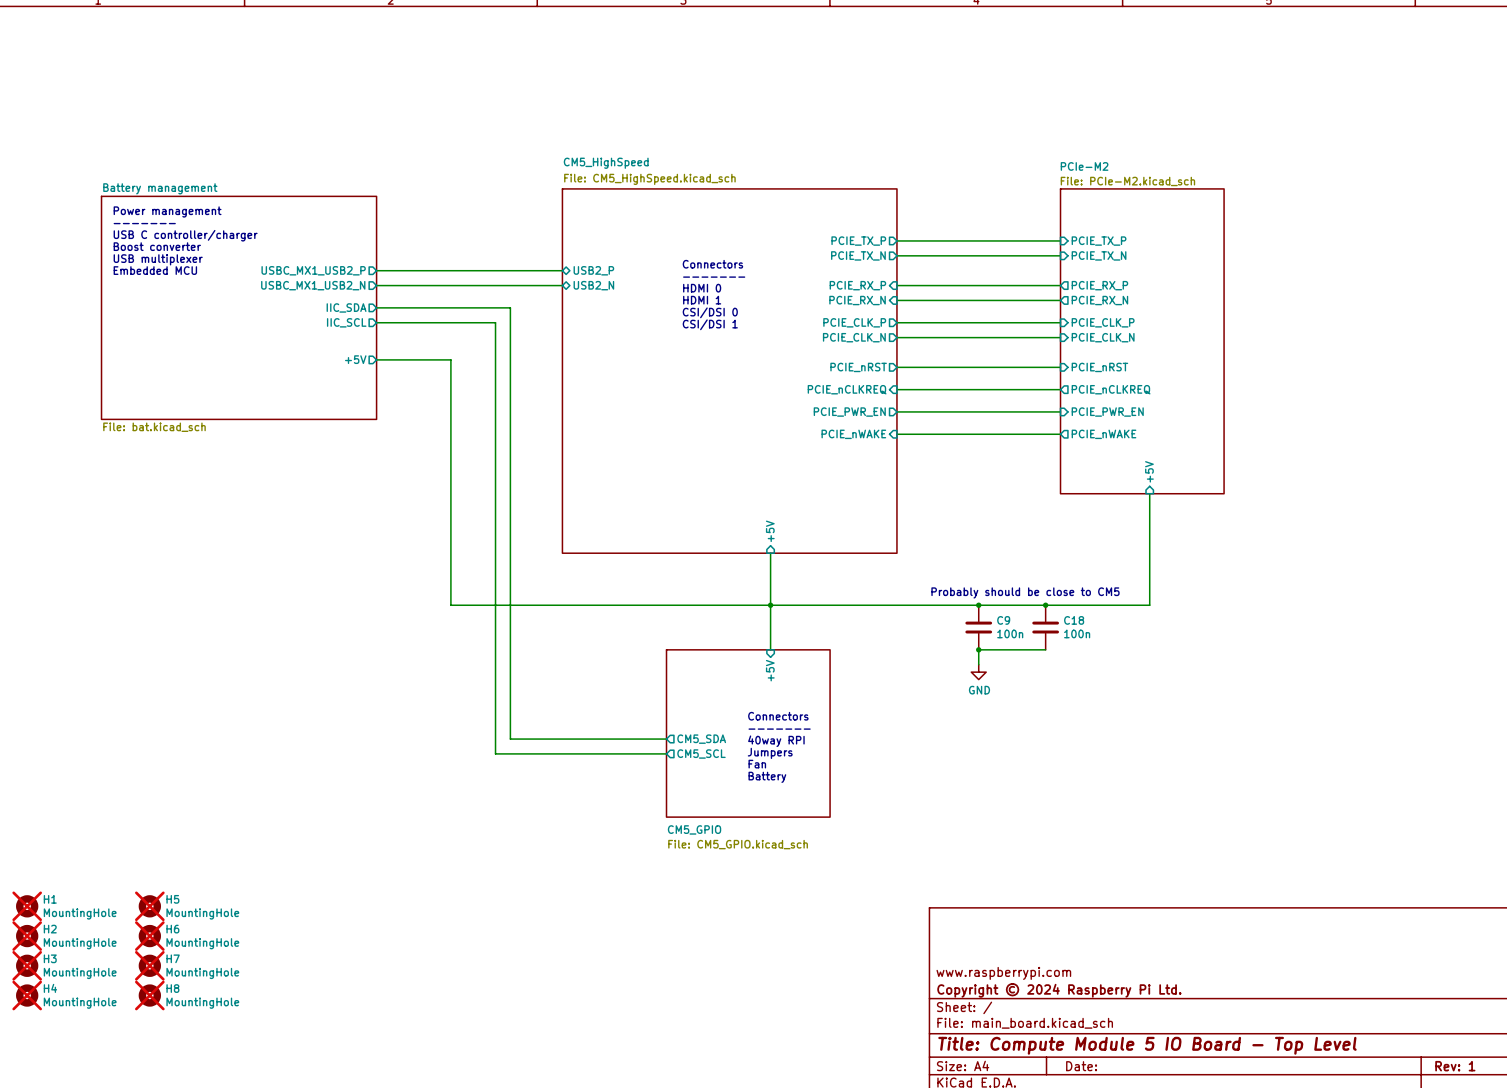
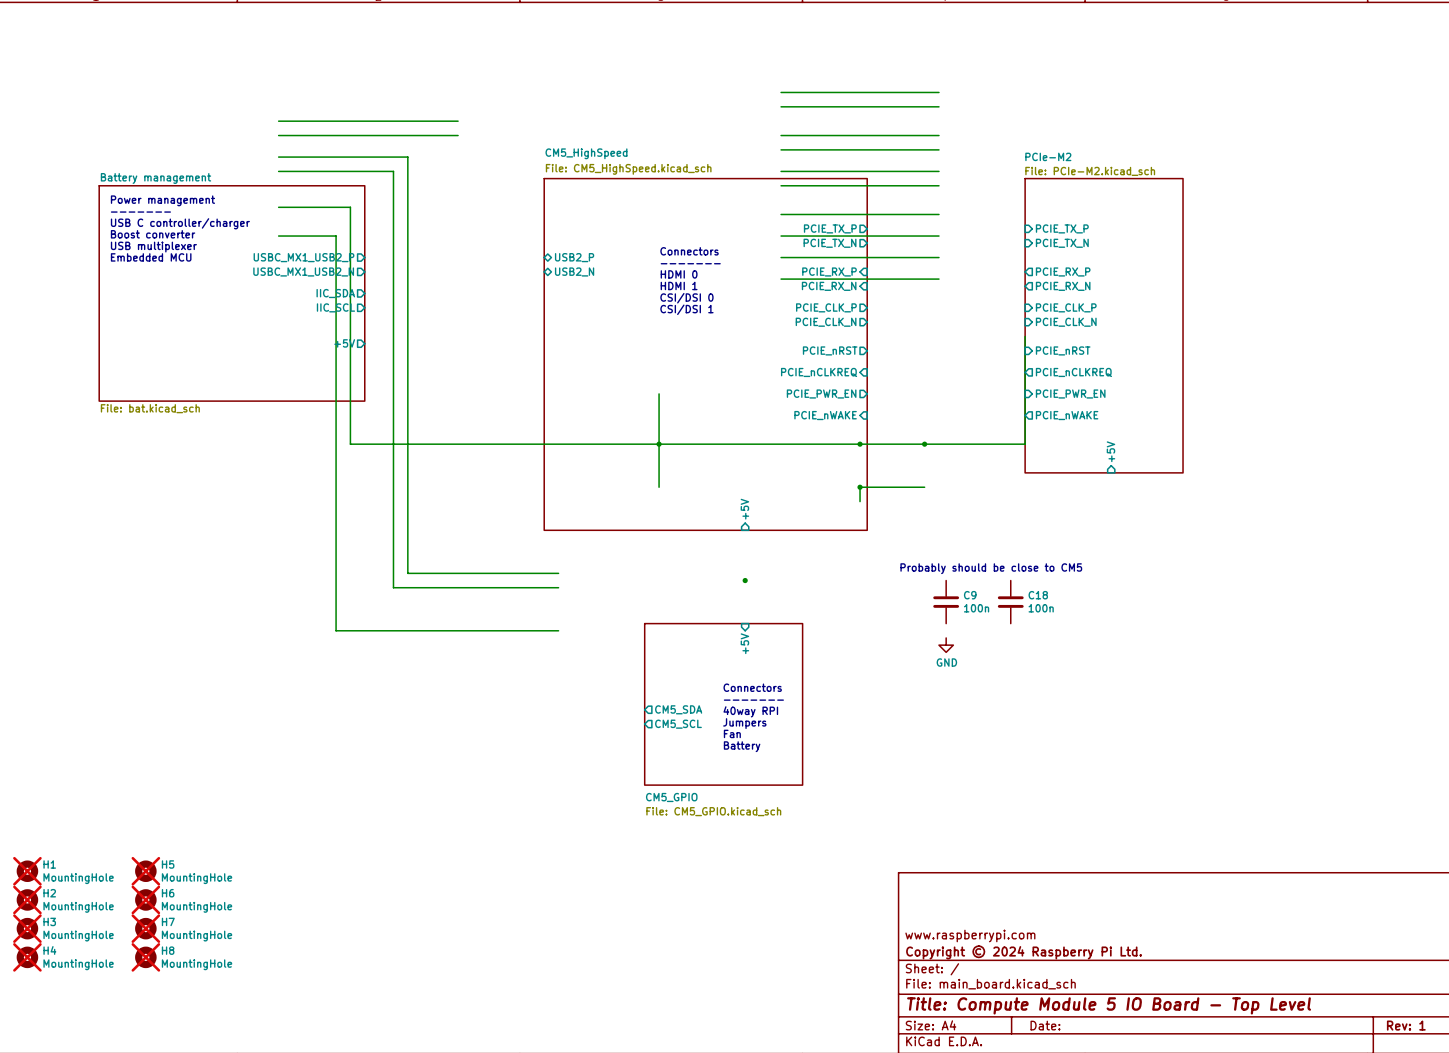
wire: none -> (781, 92) (938, 92)
wire: none -> (781, 106) (938, 106)
wire: none -> (278, 121) (458, 121)
wire: none -> (278, 135) (458, 135)
wire: none -> (278, 157) (407, 157) (407, 573) (558, 573)
wire: none -> (278, 171) (393, 171) (393, 587) (558, 587)
wire: none -> (781, 171) (938, 171)
wire: none -> (278, 207) (350, 207) (350, 444) (1025, 444) (1025, 336)
wire: (896, 240) (1060, 240) -> (781, 135) (938, 135)
wire: none -> (278, 236) (336, 236) (336, 630) (558, 630)
wire: (896, 255) (1060, 255) -> (781, 149) (938, 149)
wire: (376, 270) (562, 270) -> none
wire: (376, 285) (562, 285) -> none
wire: (896, 285) (1060, 285) -> (781, 185) (938, 185)
wire: (896, 300) (1060, 300) -> (781, 236) (938, 236)
wire: (376, 307) (510, 307) (510, 739) (666, 739) -> none
wire: (376, 322) (495, 322) (495, 753) (666, 753) -> none
wire: (896, 322) (1060, 322) -> (781, 214) (938, 214)
wire: (896, 337) (1060, 337) -> none
wire: (376, 359) (450, 359) (450, 605) (1149, 605) (1149, 493) -> none
wire: (896, 367) (1060, 367) -> (781, 257) (938, 257)
wire: (896, 389) (1060, 389) -> (781, 279) (938, 279)
wire: none -> (659, 393) (659, 487)
wire: (896, 411) (1060, 411) -> none
wire: (896, 434) (1060, 434) -> none
junction: none -> (659, 444)
junction: none -> (860, 444)
junction: none -> (924, 444)
junction: none -> (860, 487)
wire: none -> (924, 487) (860, 487) (860, 501)
wire: (770, 553) (770, 649) -> none
junction: (978, 605) -> none
junction: (1045, 605) -> none
junction: (978, 649) -> none
wire: (1045, 649) (978, 649) (978, 664) -> none

